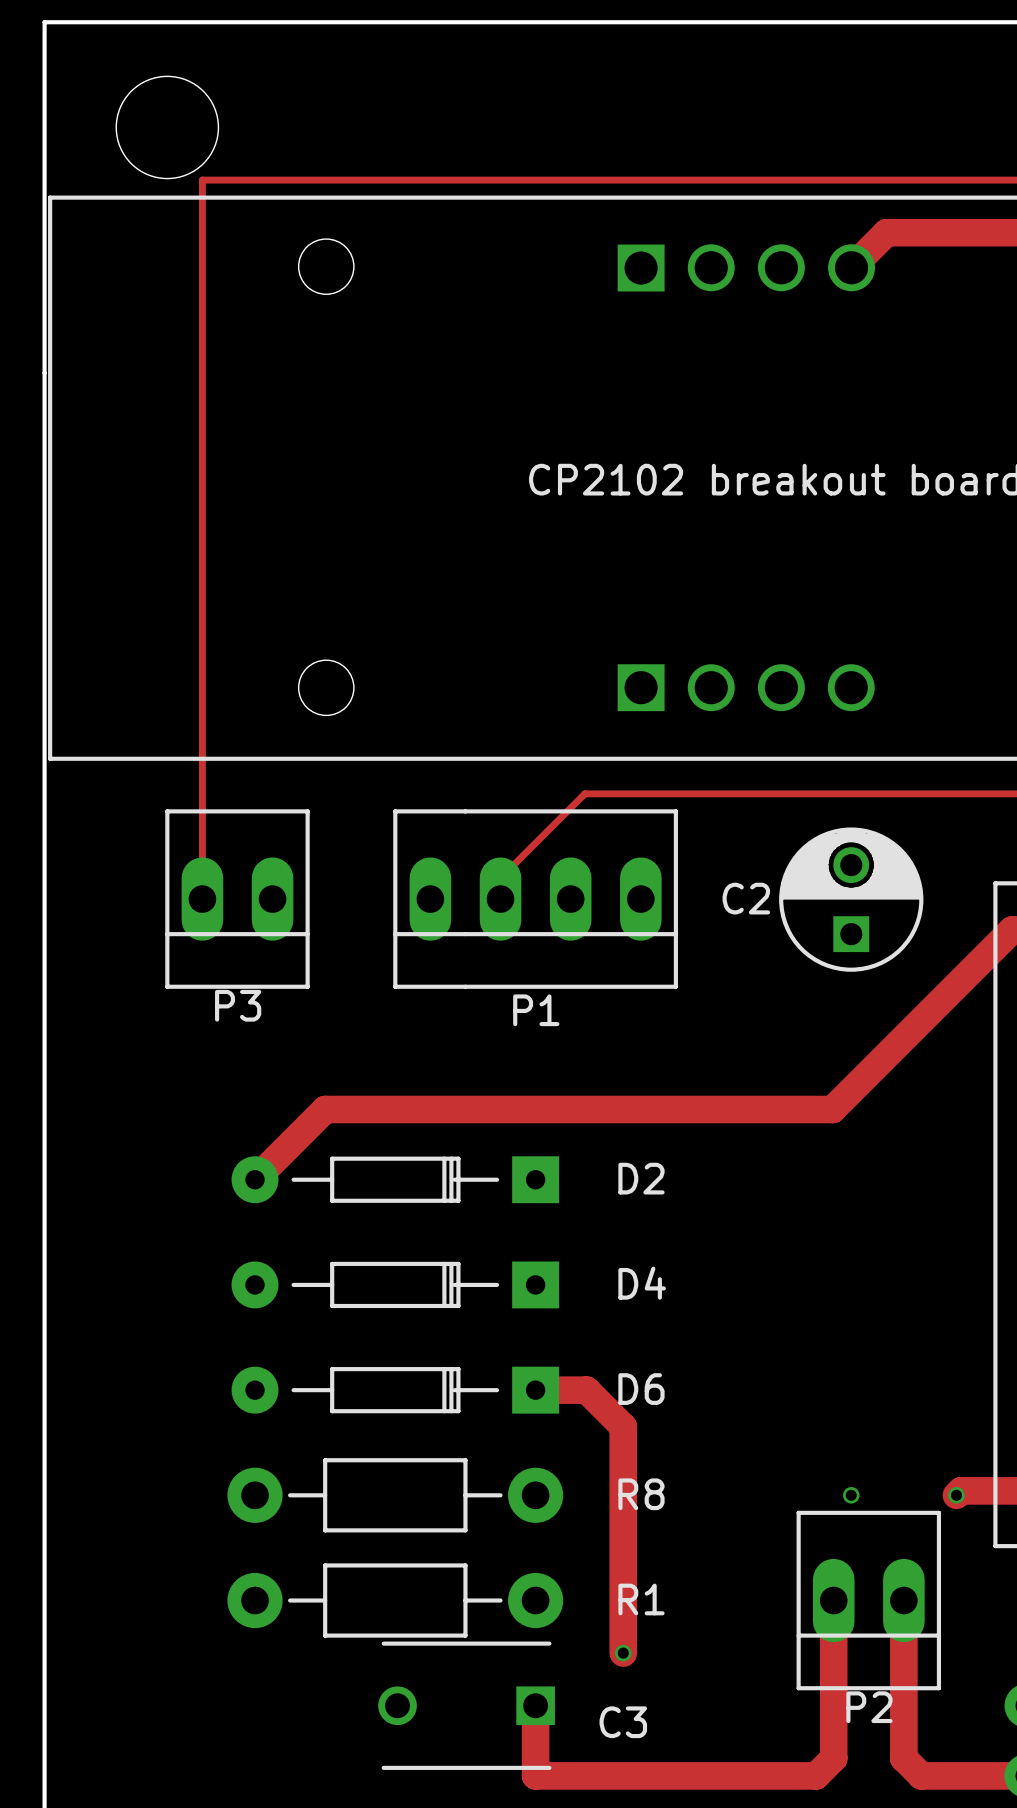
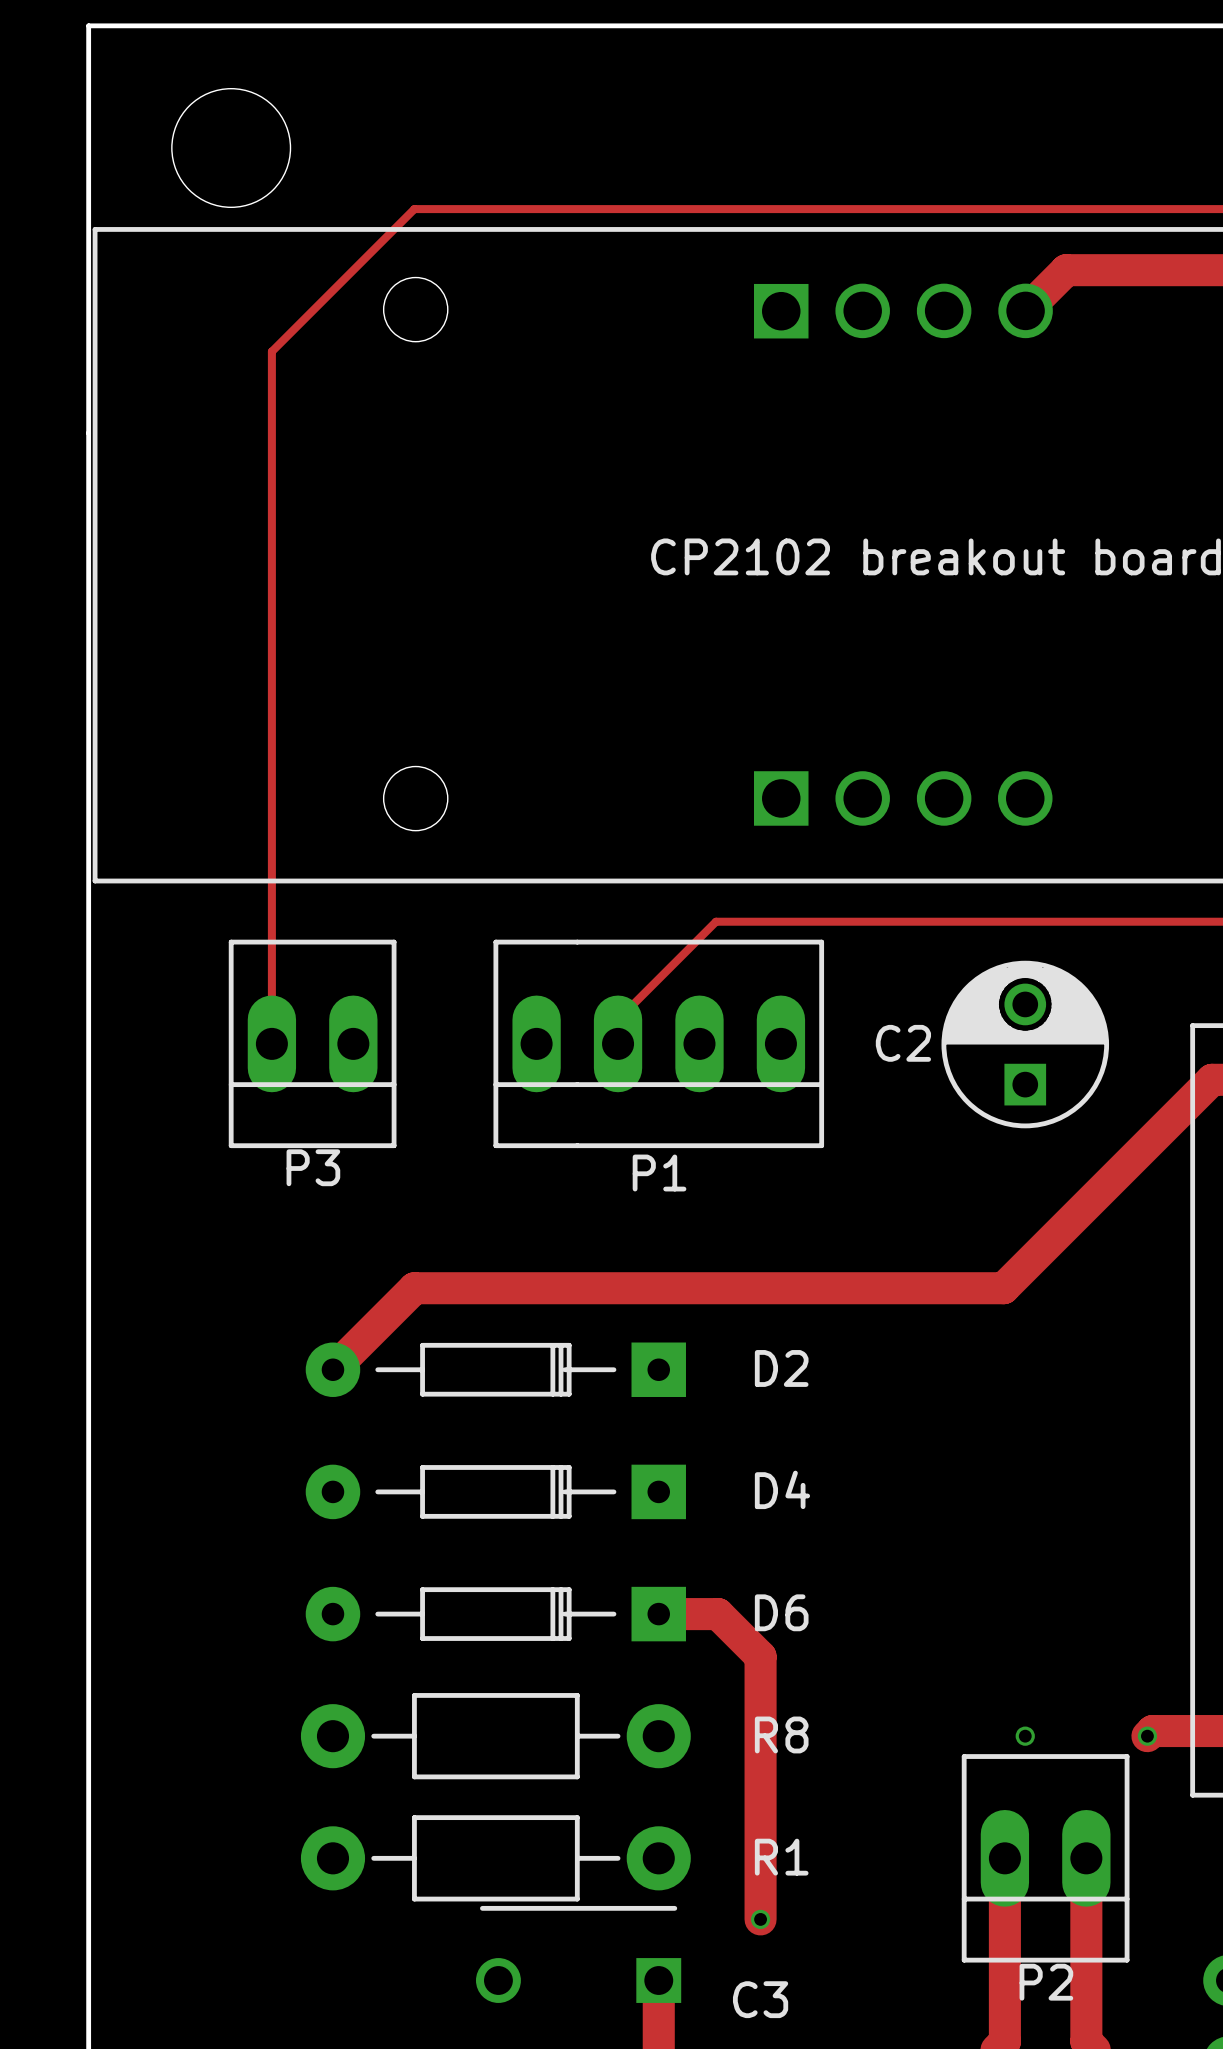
track: (325, 180) (202, 180) (202, 302) -> (414, 209) (271, 351)

